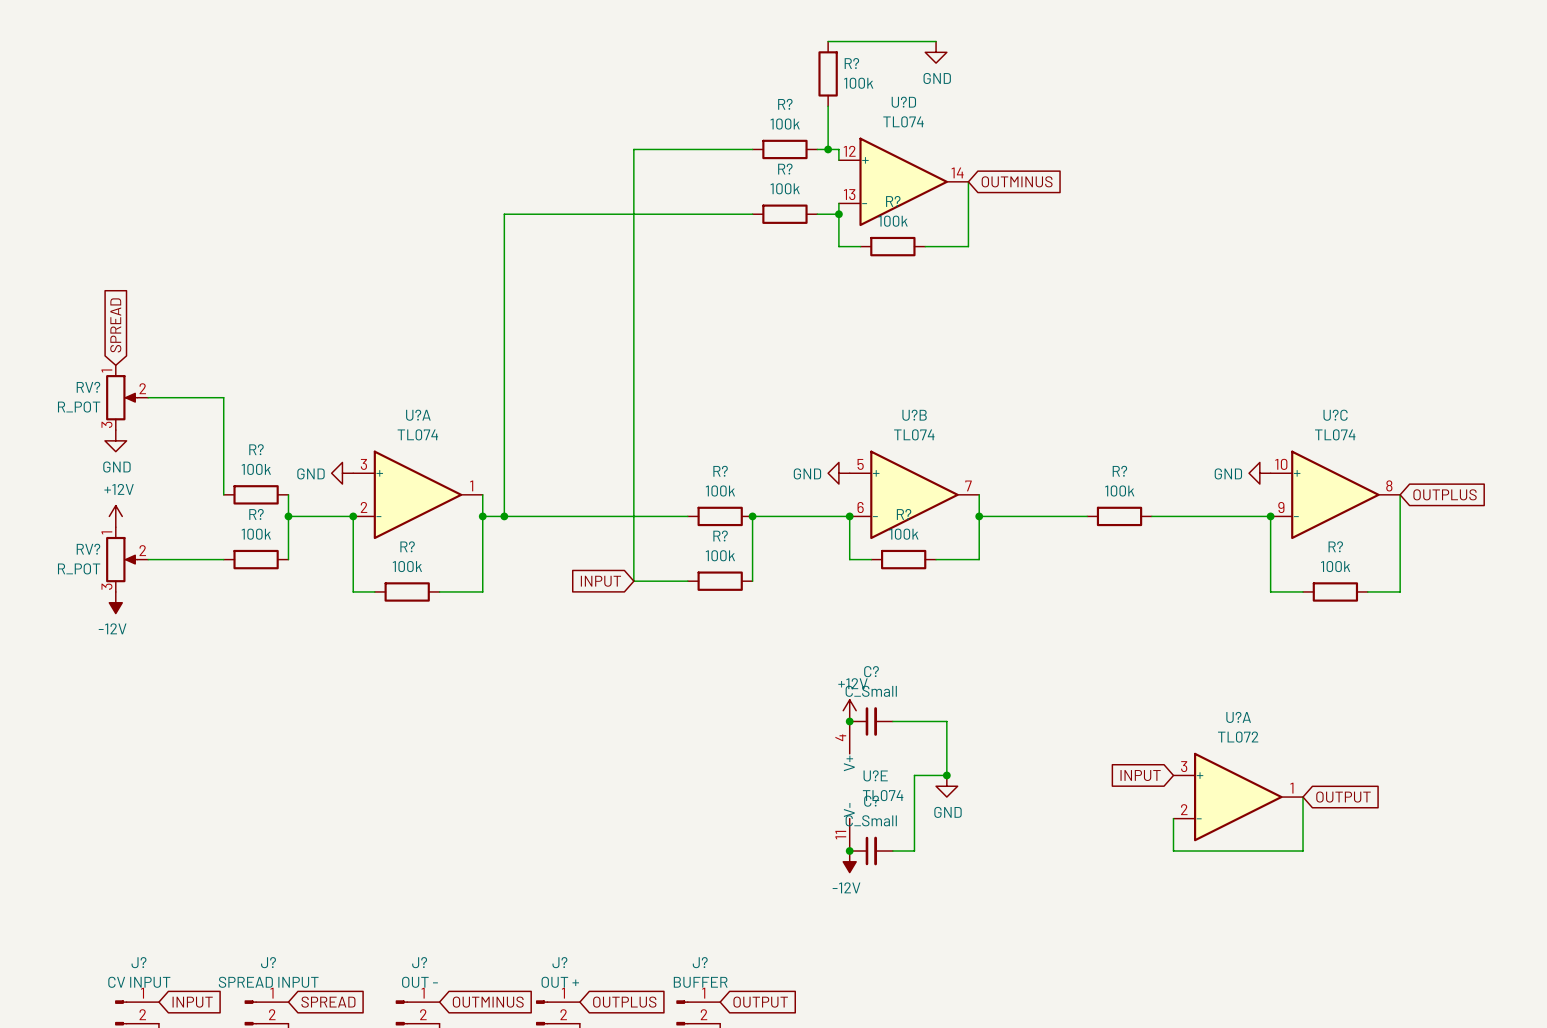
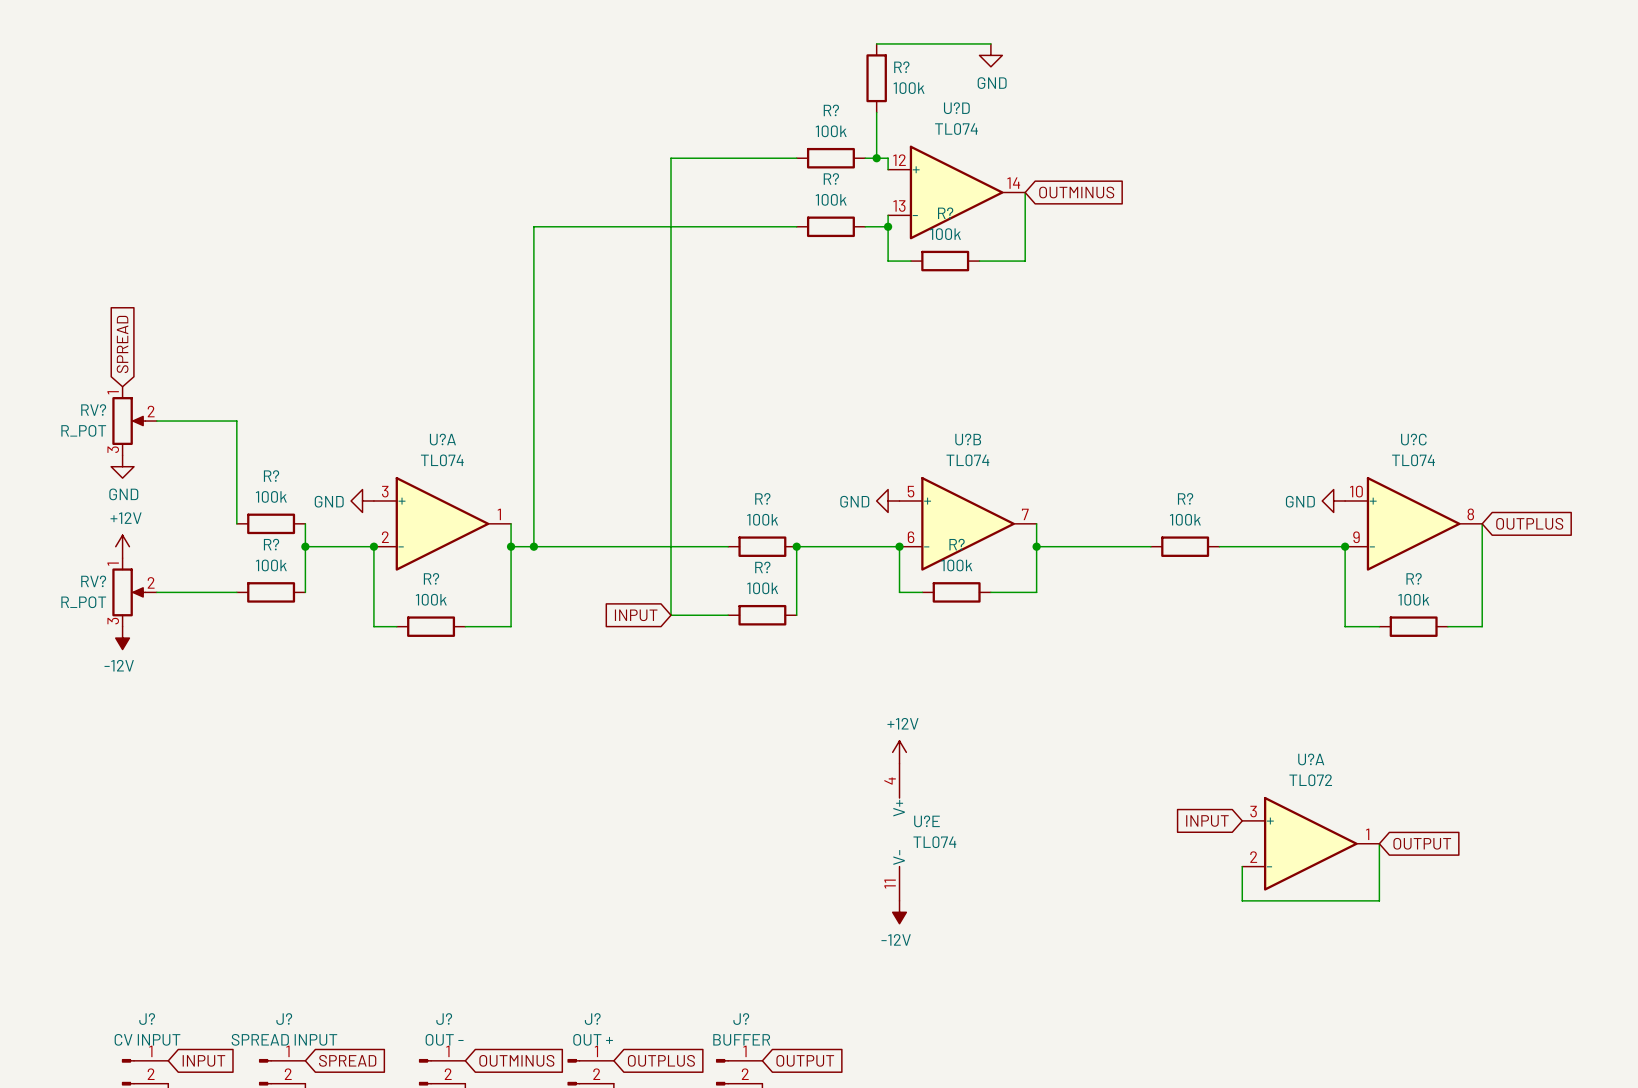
junction: (849, 721) -> none
C?: C_Small (871, 721) -> none
wire: (892, 721) (946, 721) (946, 775) (914, 775) (914, 851) (892, 851) -> none
junction: (946, 775) -> none
power symbol: GND (946, 786) -> none
junction: (849, 851) -> none
C?: C_Small (871, 851) -> none

